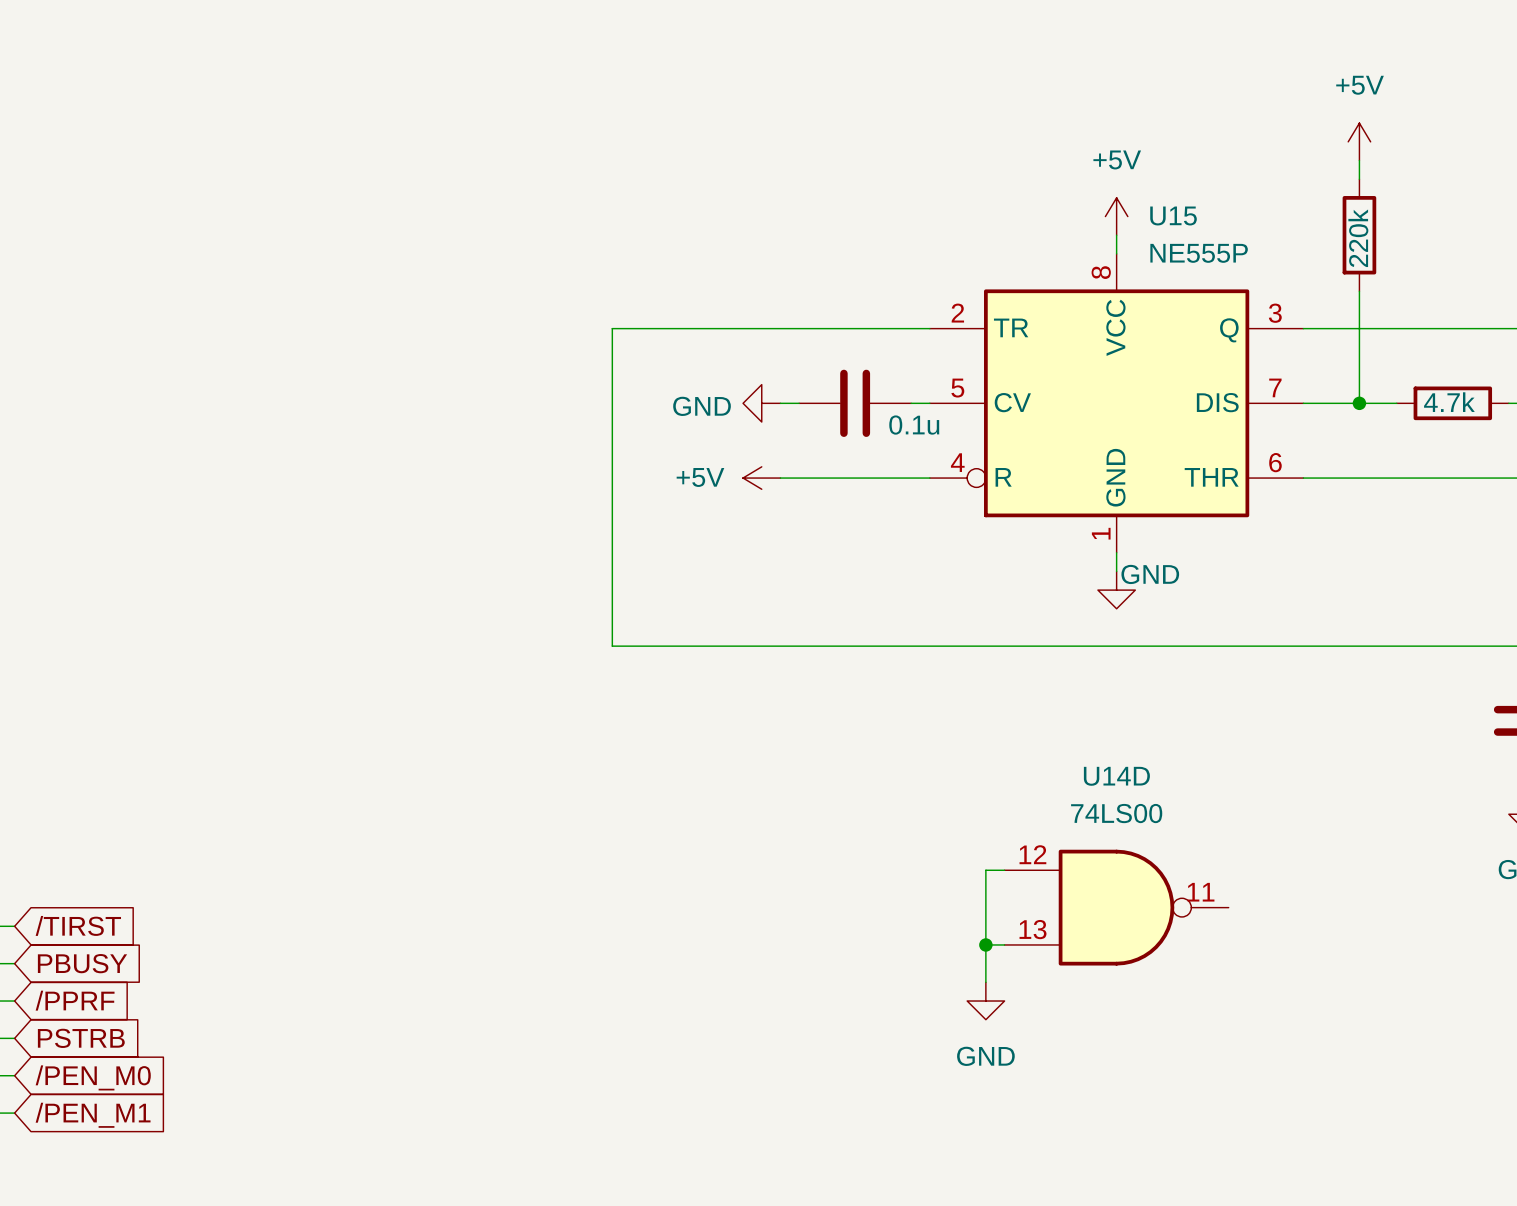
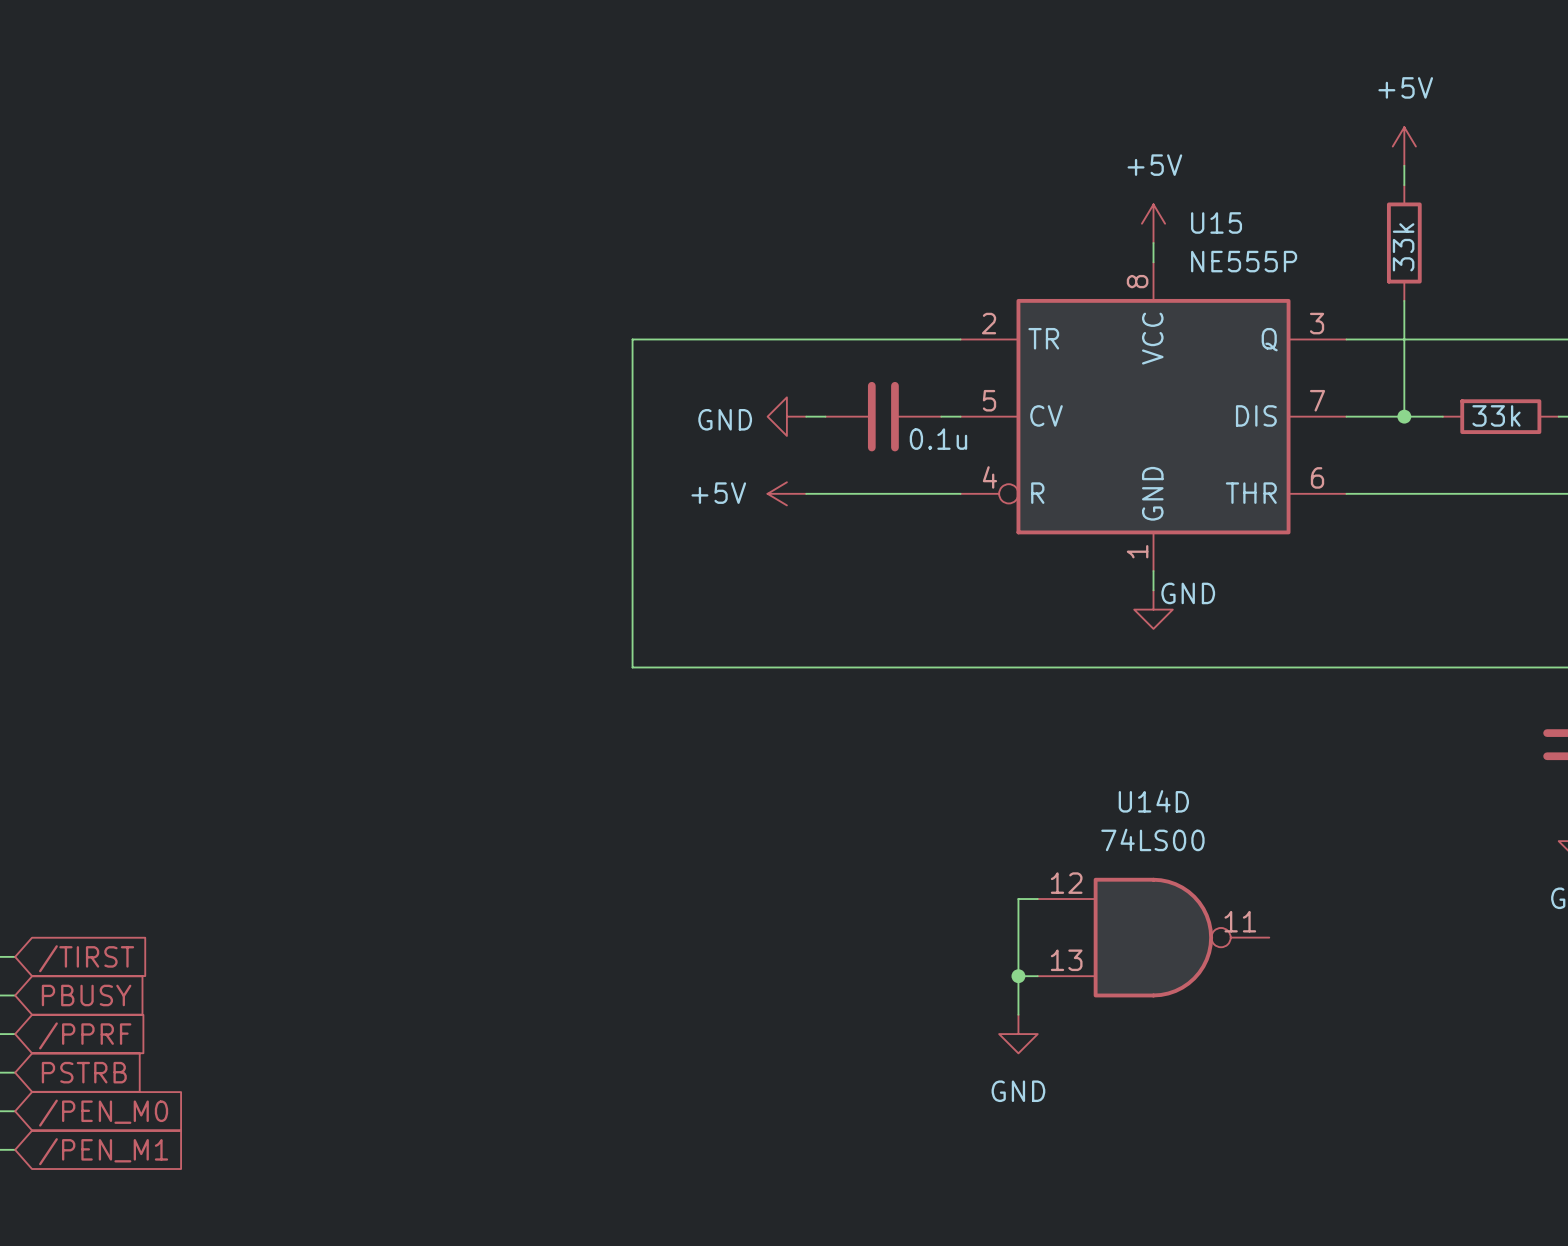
part value: 220k (1358, 238) -> 33k (1403, 247)
part value: 4.7k (1449, 402) -> 33k (1496, 415)

